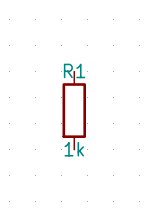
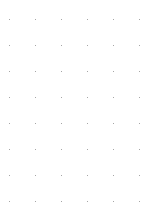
R1: 1k (74, 110) -> none

